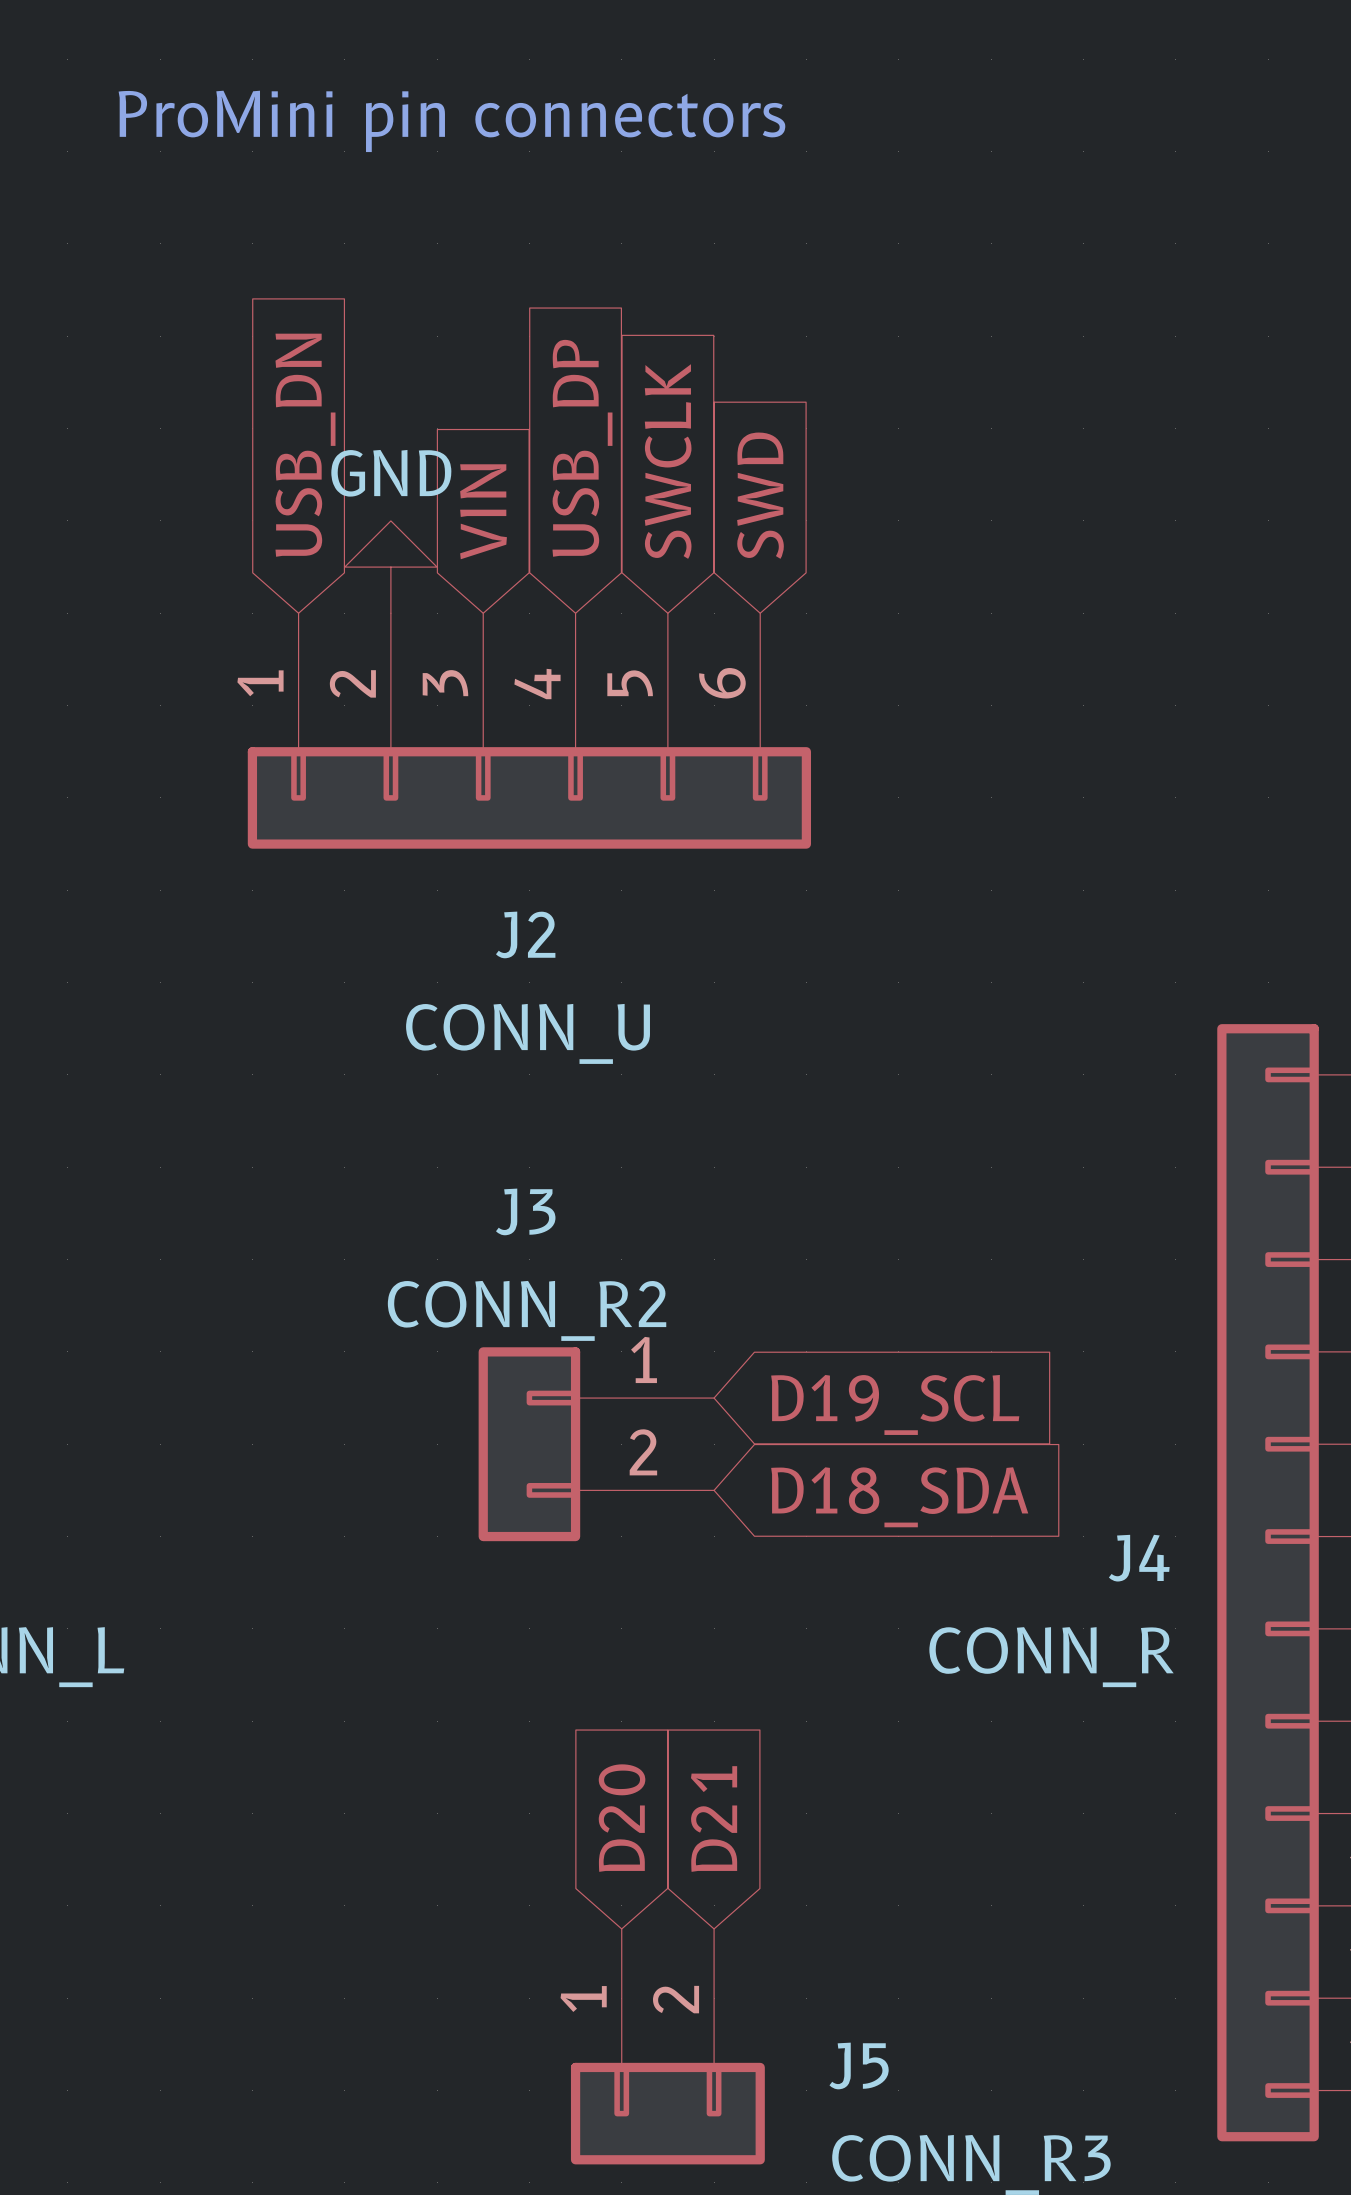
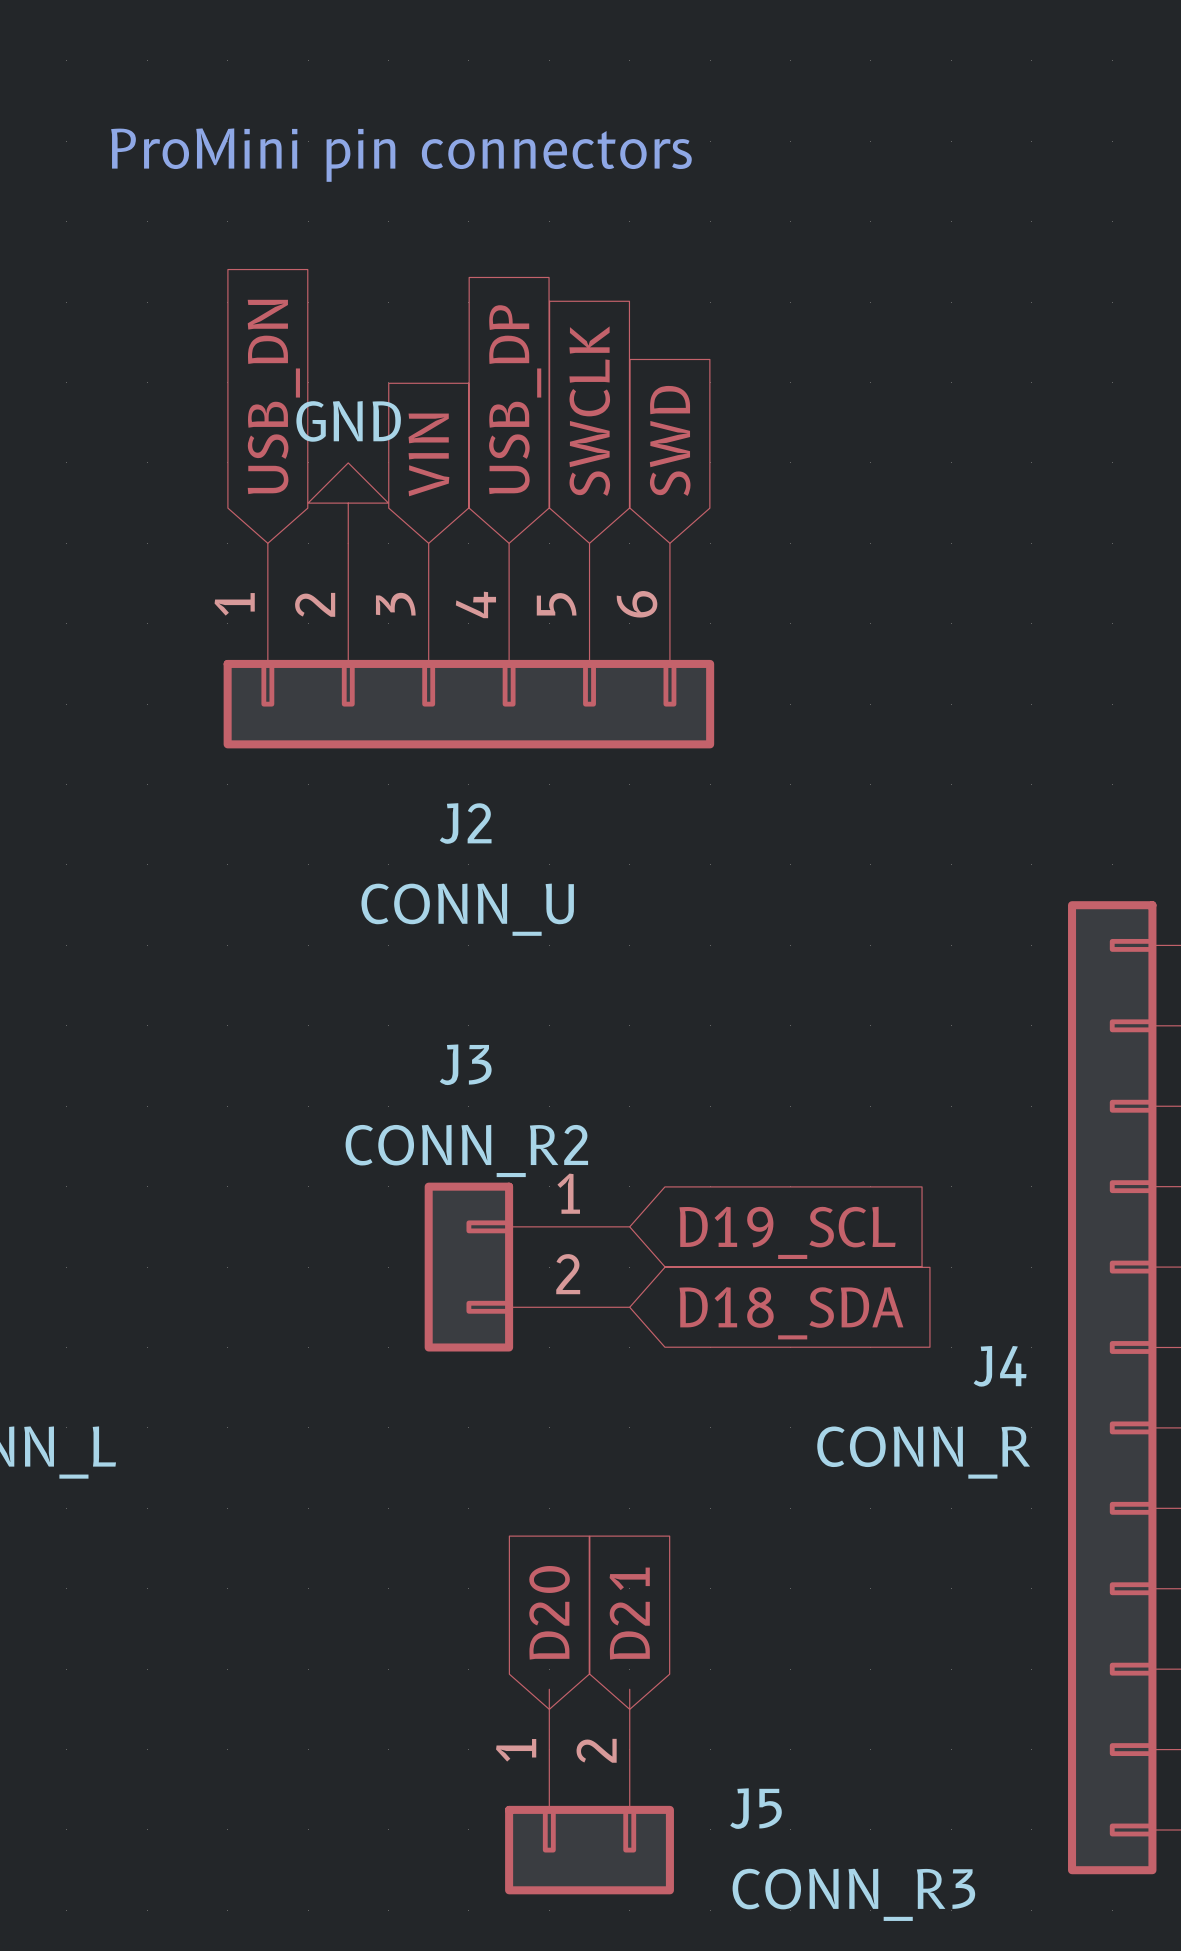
text position: ProMini pin connectors (451, 121) -> ProMini pin connectors (401, 155)
global label position: D20 (622, 1818) -> D20 (549, 1612)
global label position: D21 (714, 1819) -> D21 (629, 1613)

